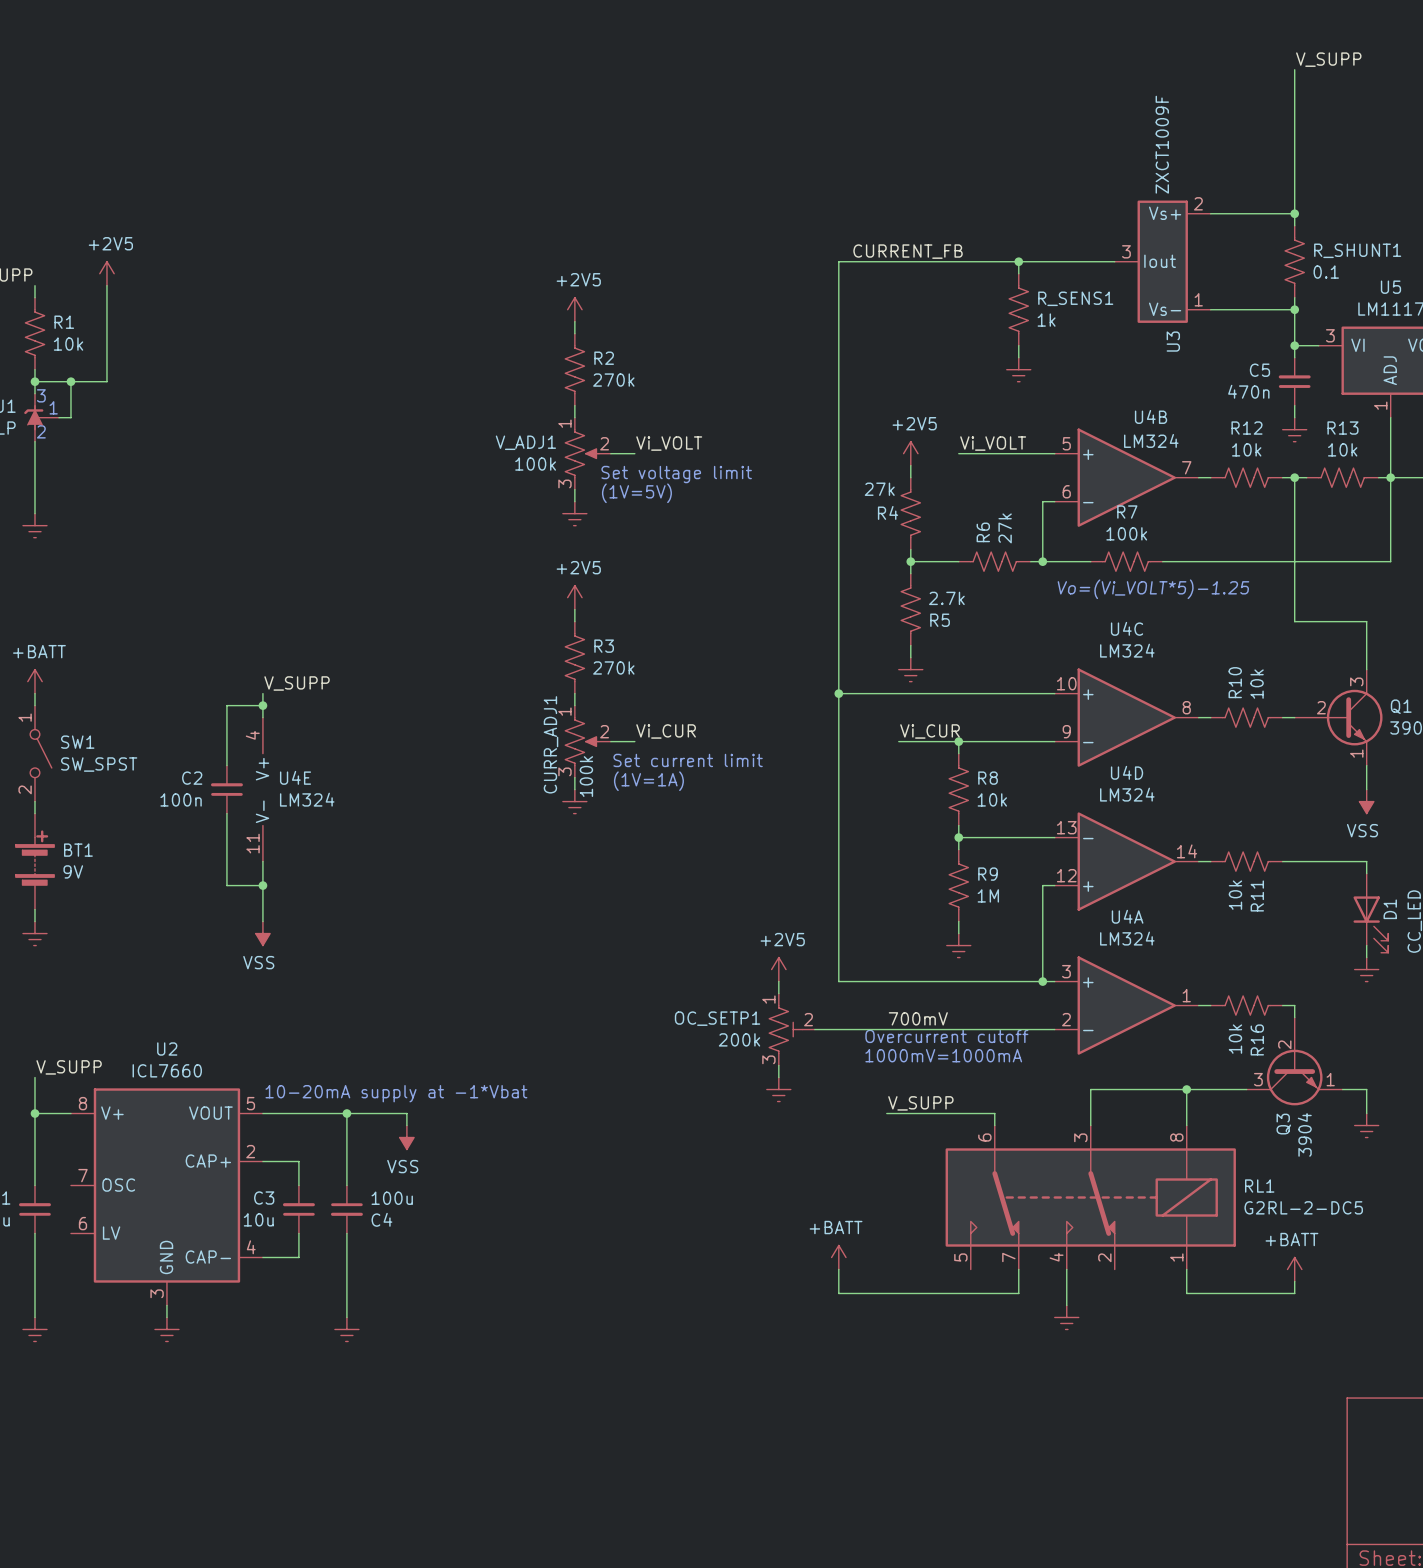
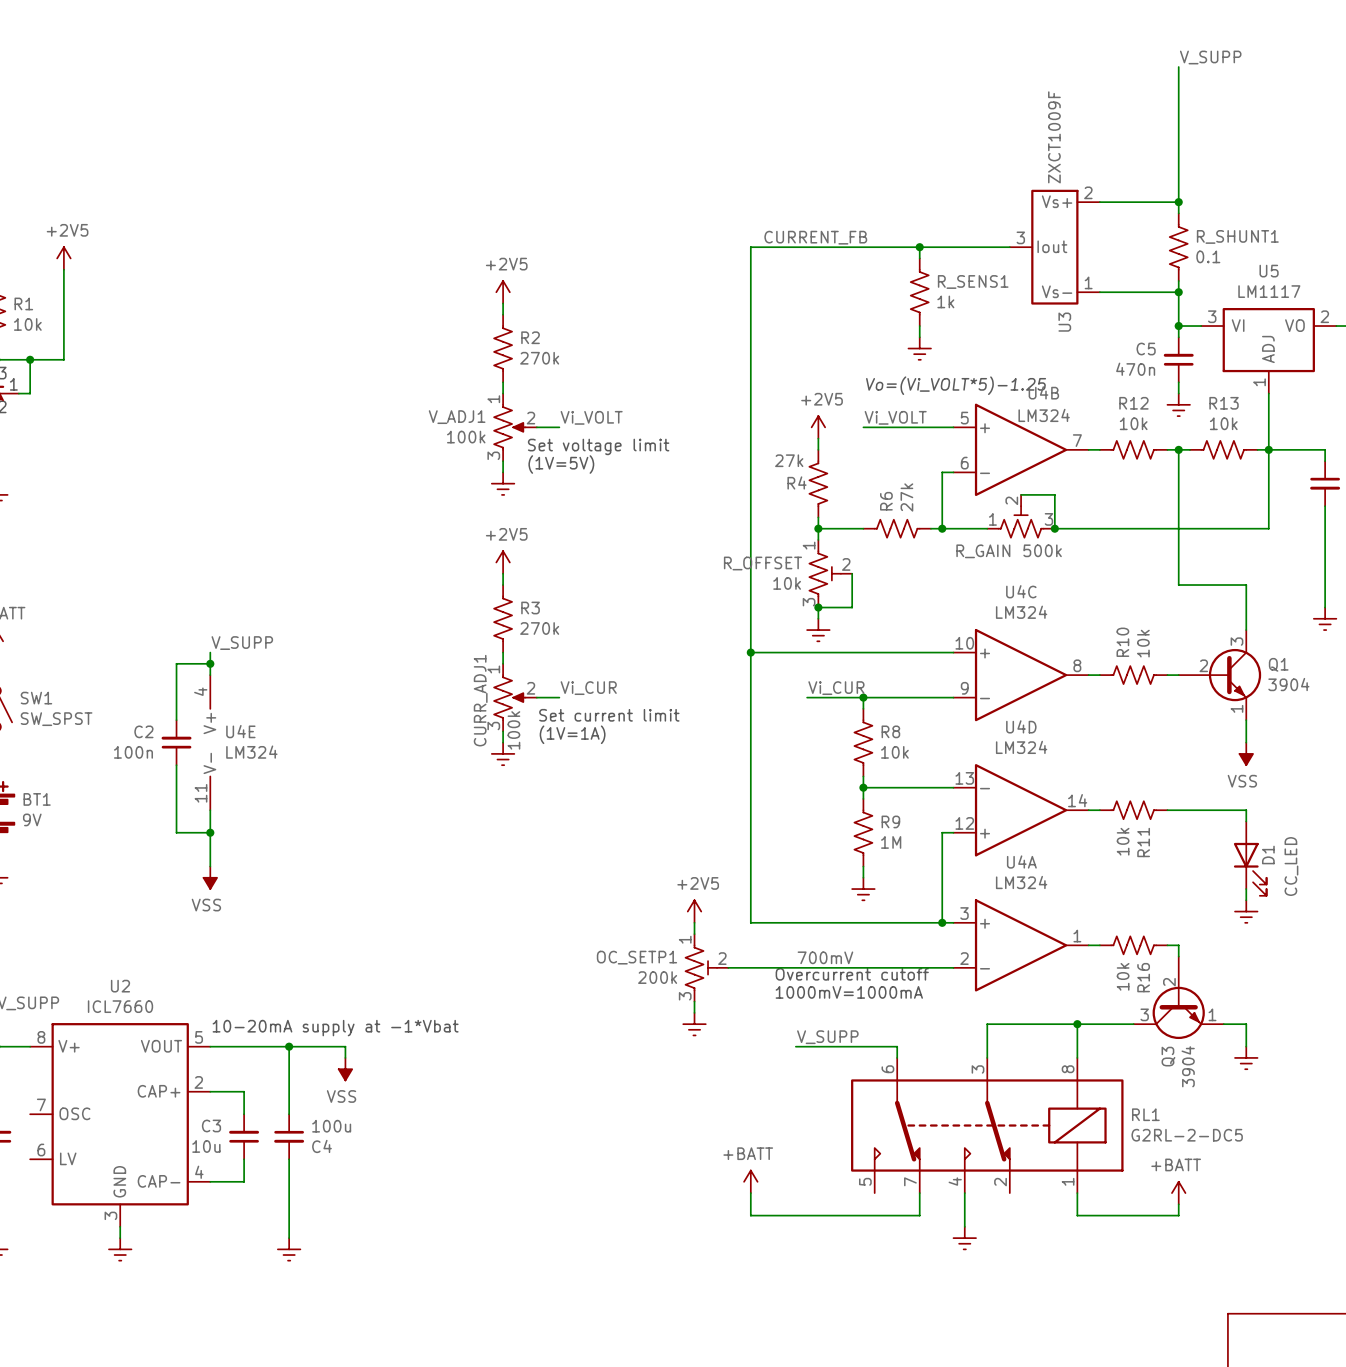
wire: none -> (1021, 494) (1054, 494) (1054, 528)
R_GAIN: none -> 500k (1021, 516)
R7: 100k (1126, 561) -> none
junction: none -> (1054, 528)
text position: Vo=(Vi_VOLT*5)-1.25 (1153, 589) -> Vo=(Vi_VOLT*5)-1.25 (956, 385)
R5: 2.7k (910, 609) -> none
R_OFFSET: none -> 10k (830, 573)
wire: none -> (852, 573) (852, 607) (818, 607)
junction: none -> (818, 607)

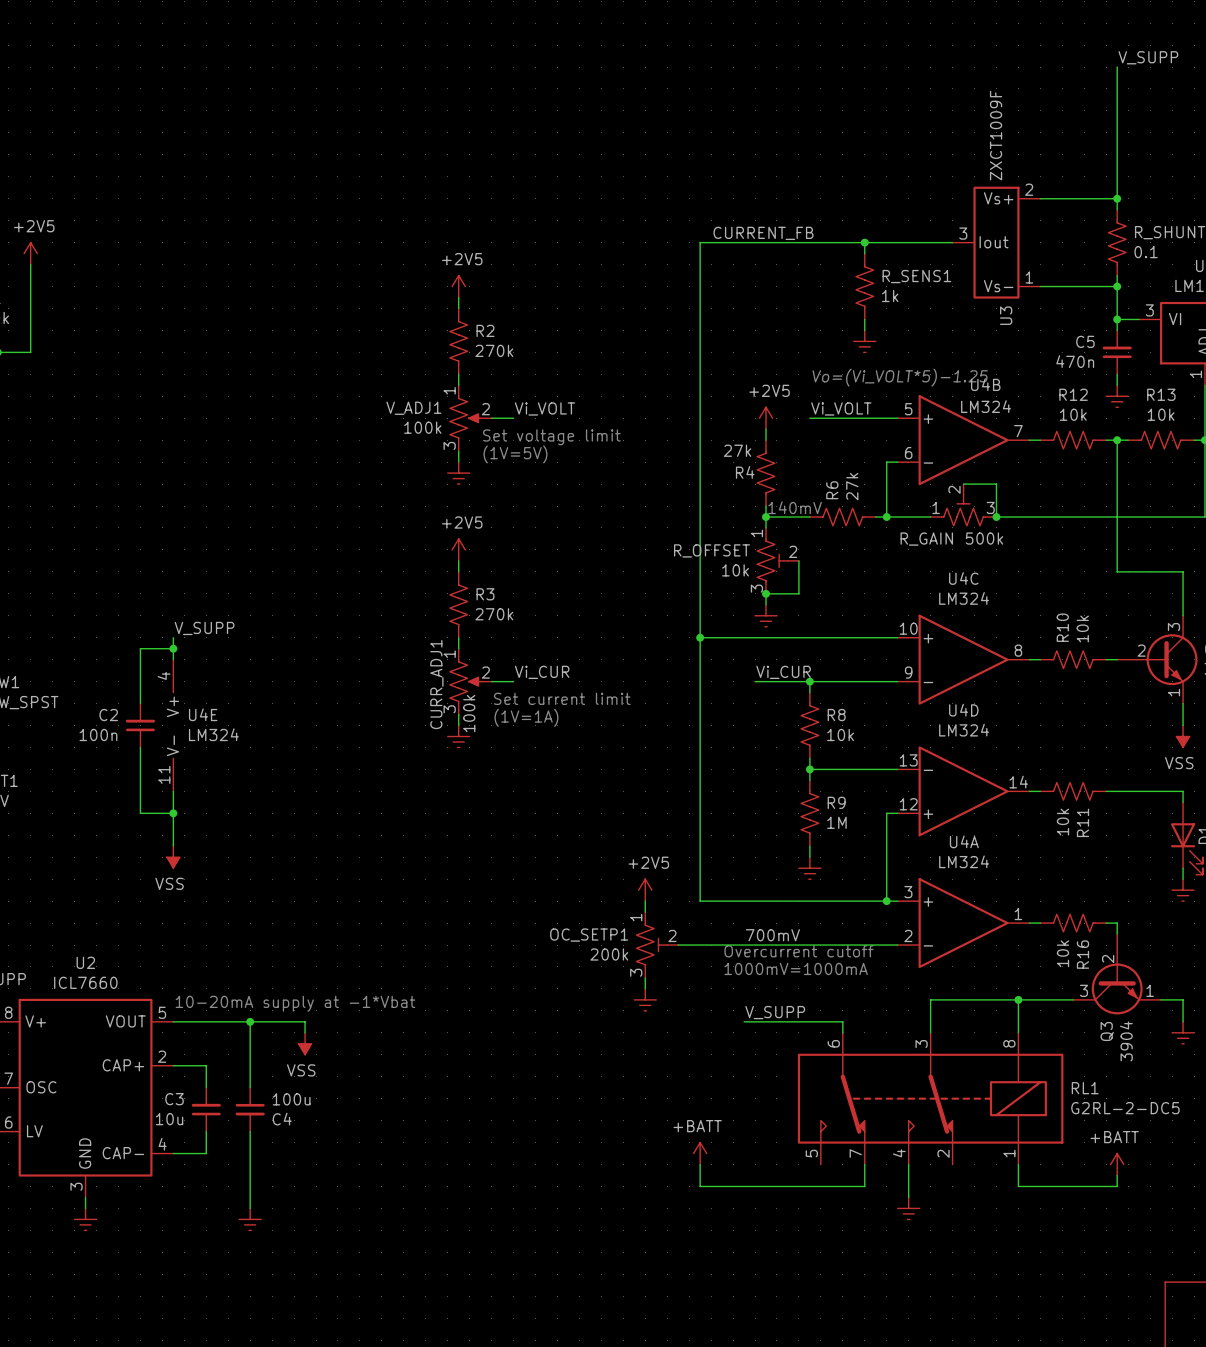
text: none -> 140mV (795, 507)

